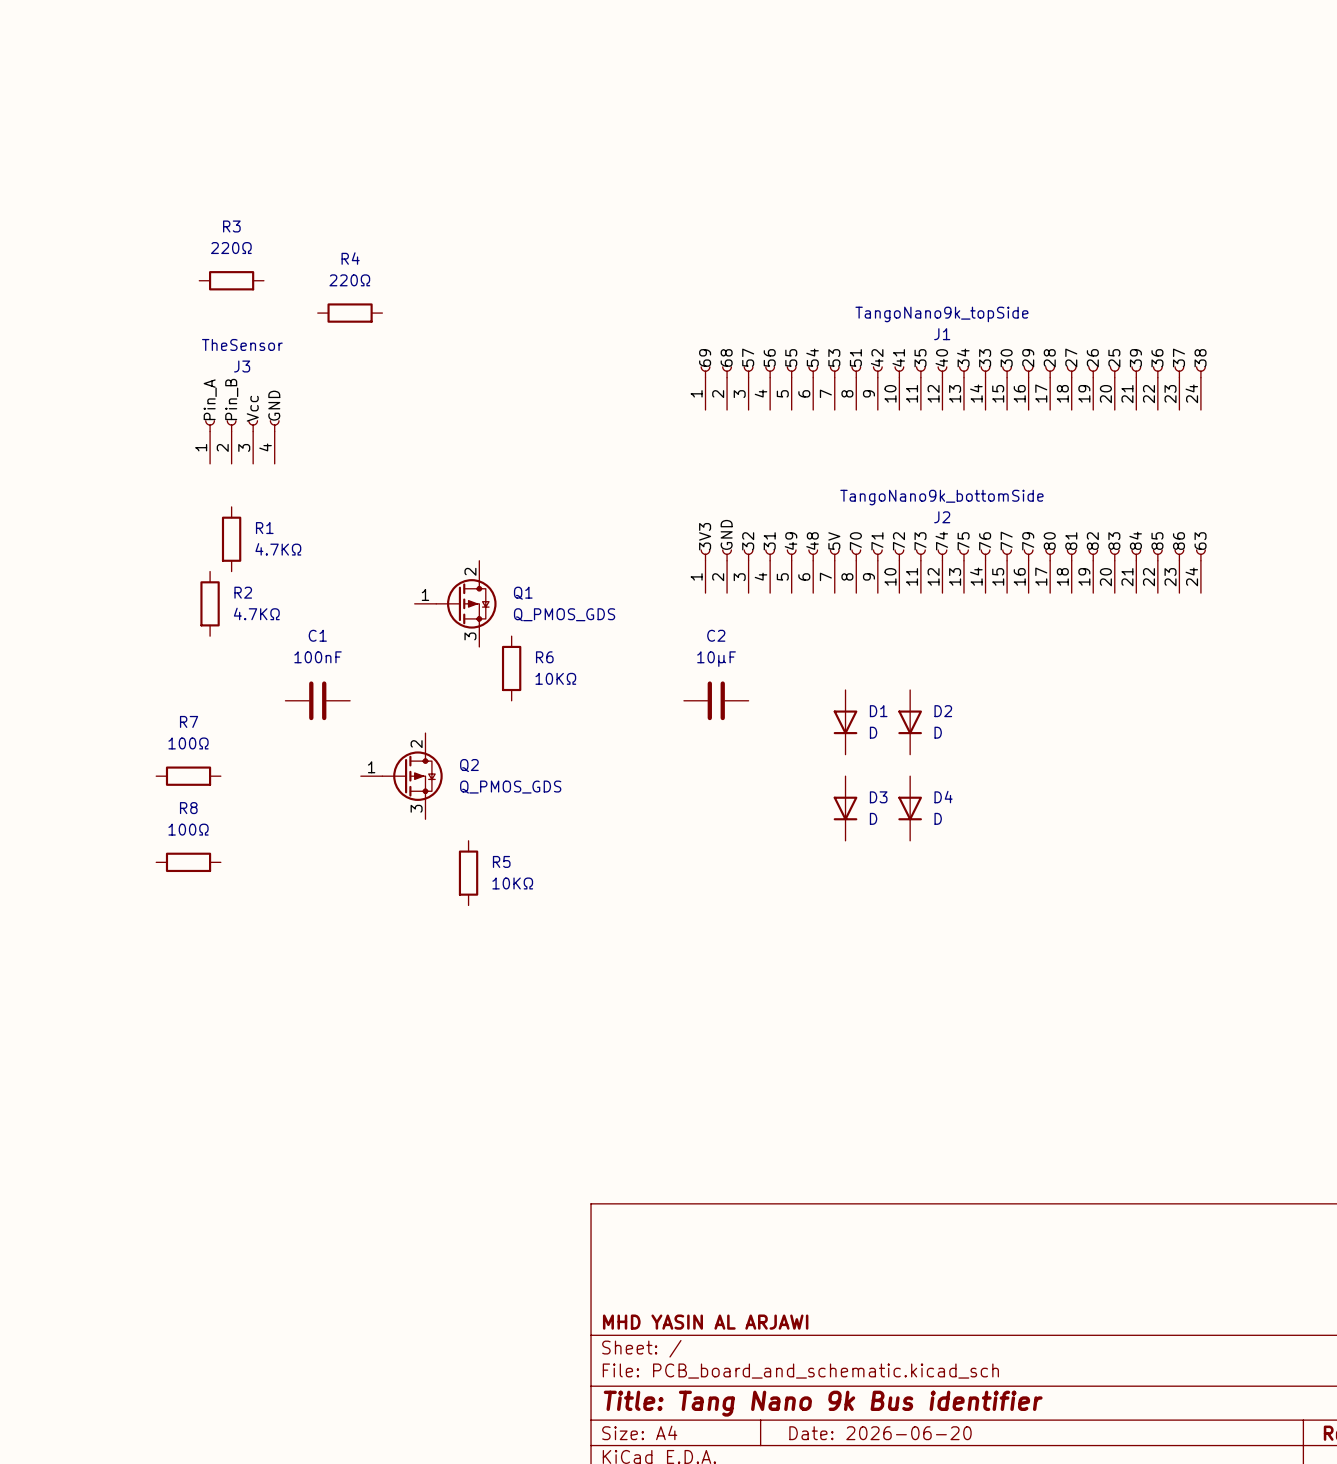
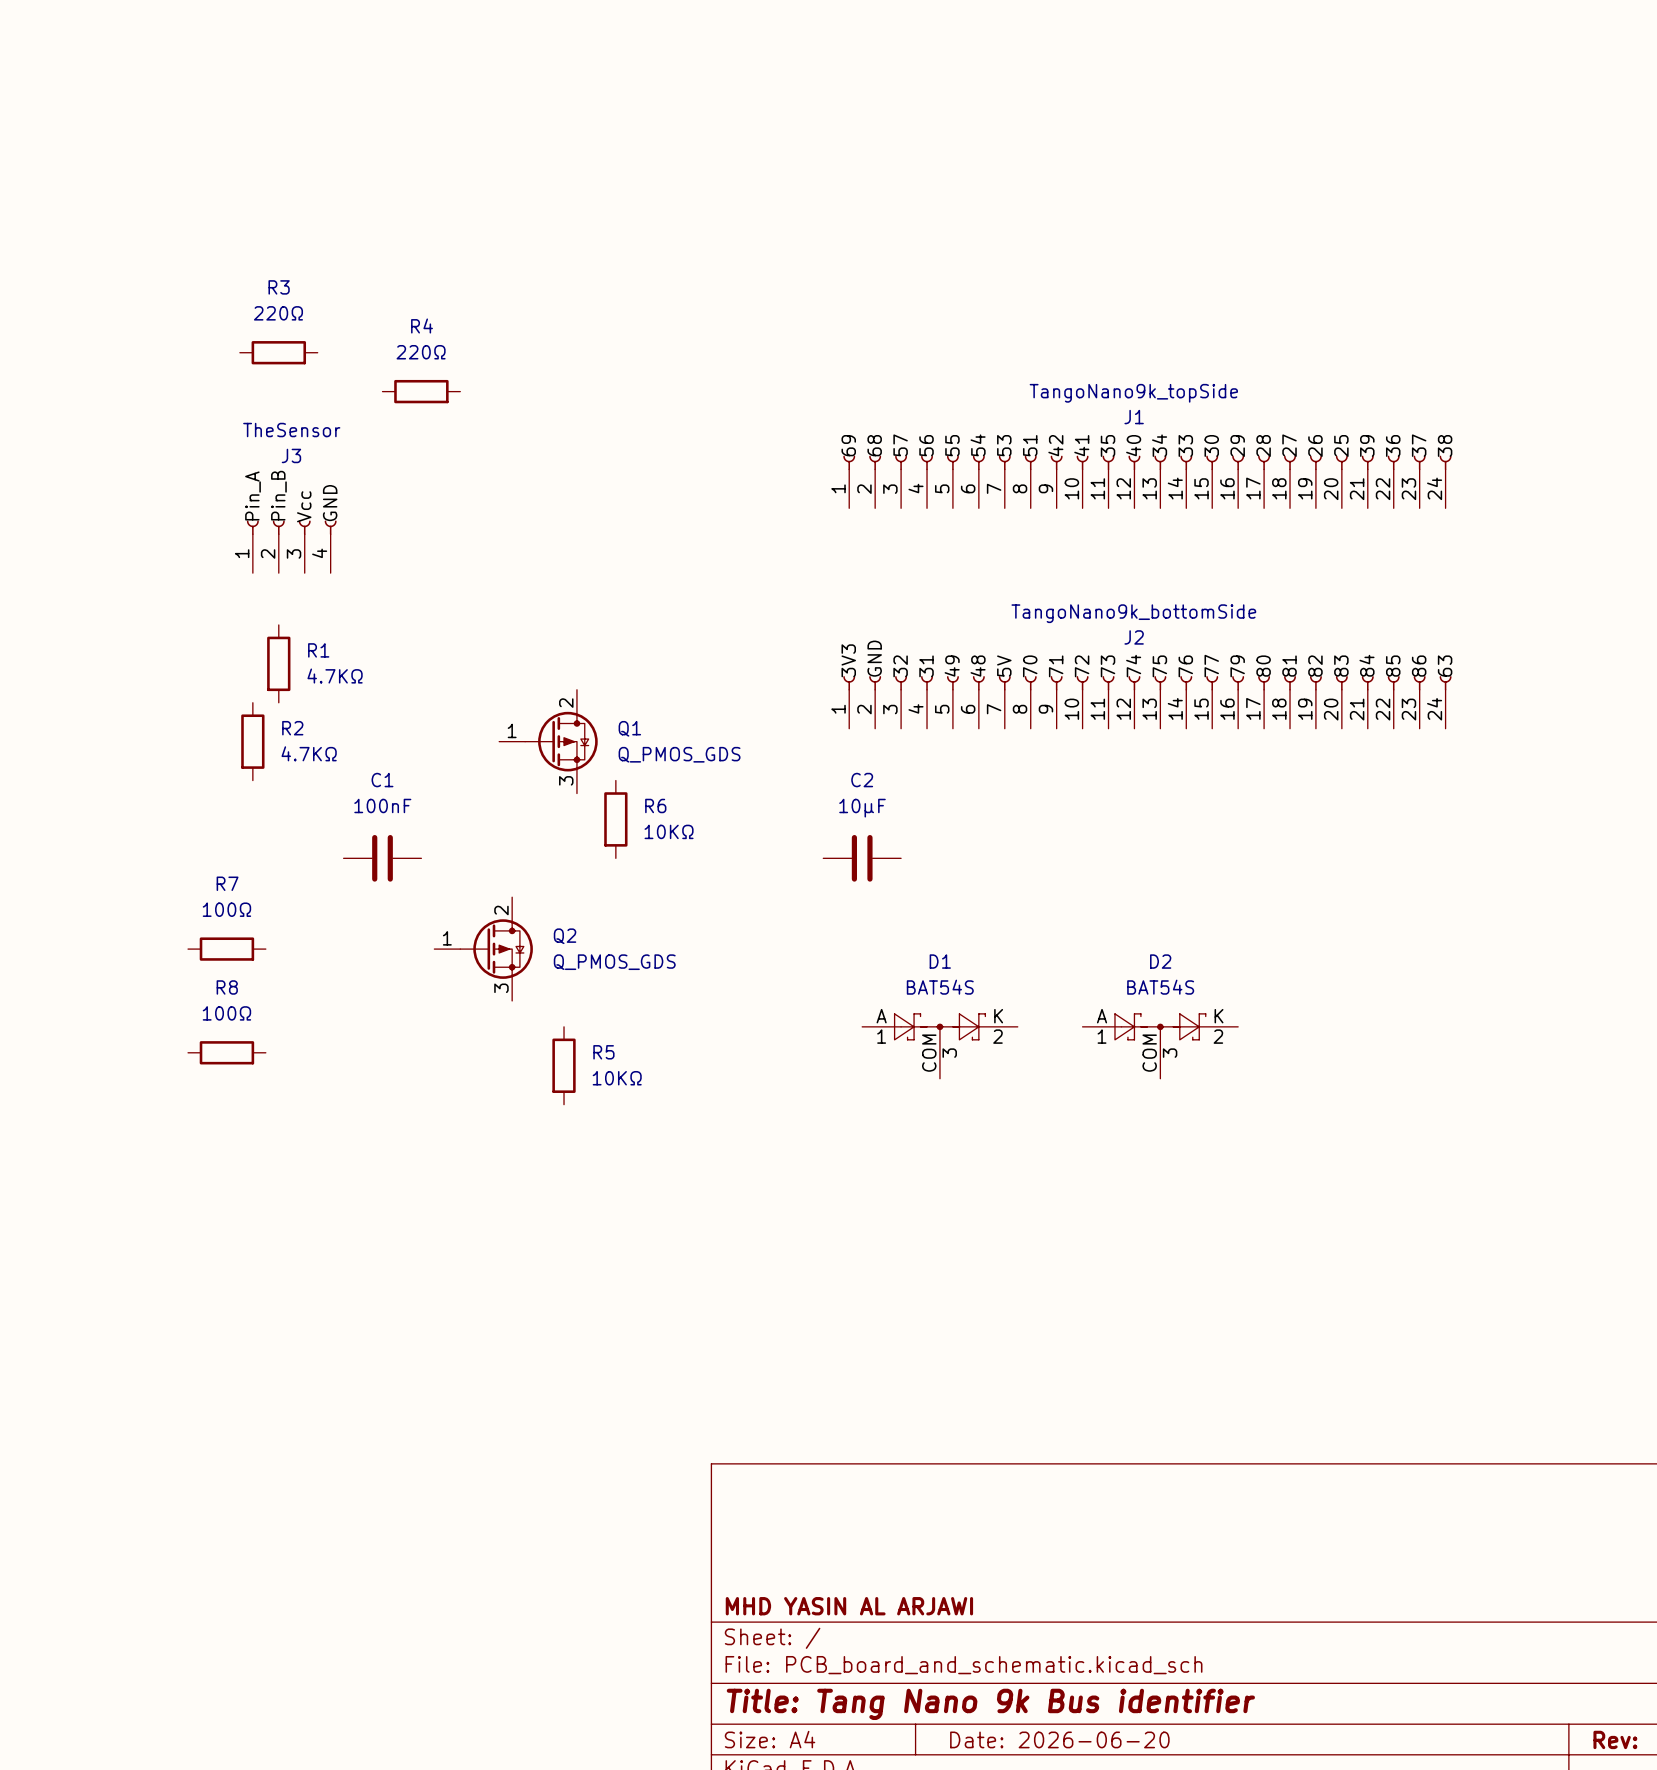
D1 symbol: [833, 690, 858, 755] -> [862, 1013, 1018, 1079]
D2 symbol: [898, 690, 922, 755] -> [1082, 1013, 1239, 1079]
D1 name position: D1 (878, 711) -> D1 (940, 961)
D2 name position: D2 (943, 711) -> D2 (1160, 961)
D1 value: D (873, 732) -> BAT54S (940, 987)
D2 value: D (938, 732) -> BAT54S (1160, 987)
D3: D (845, 808) -> none
D4: D (910, 808) -> none

